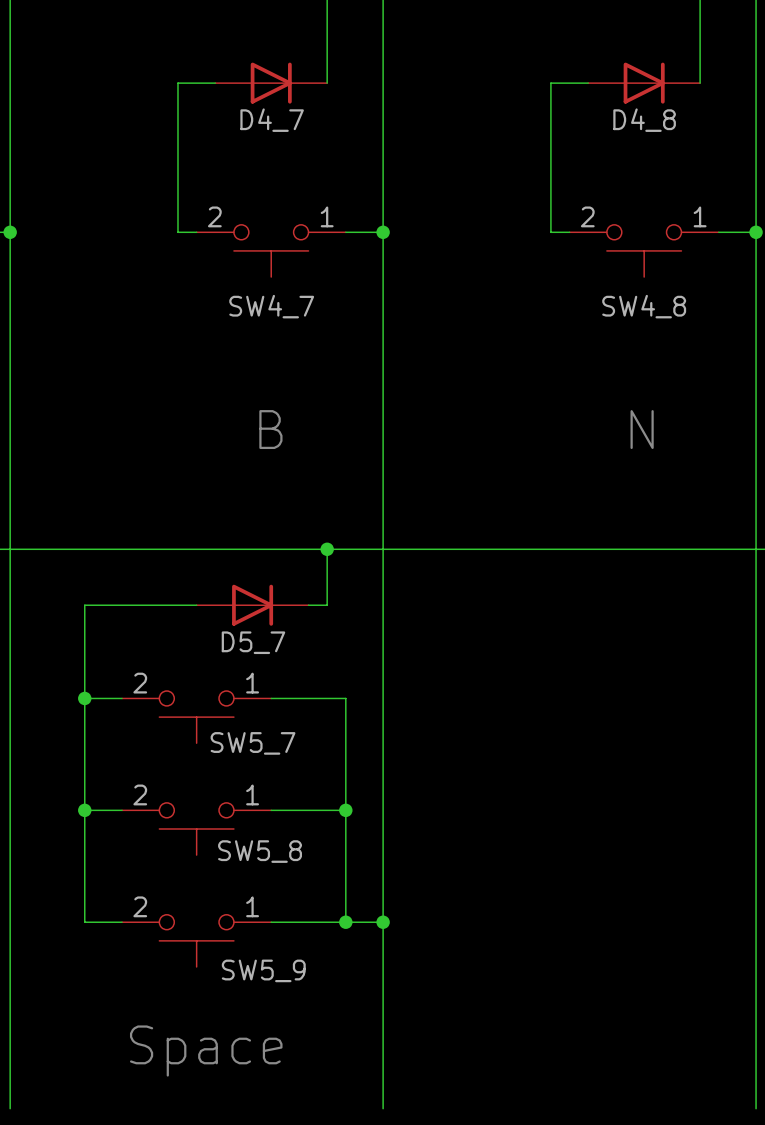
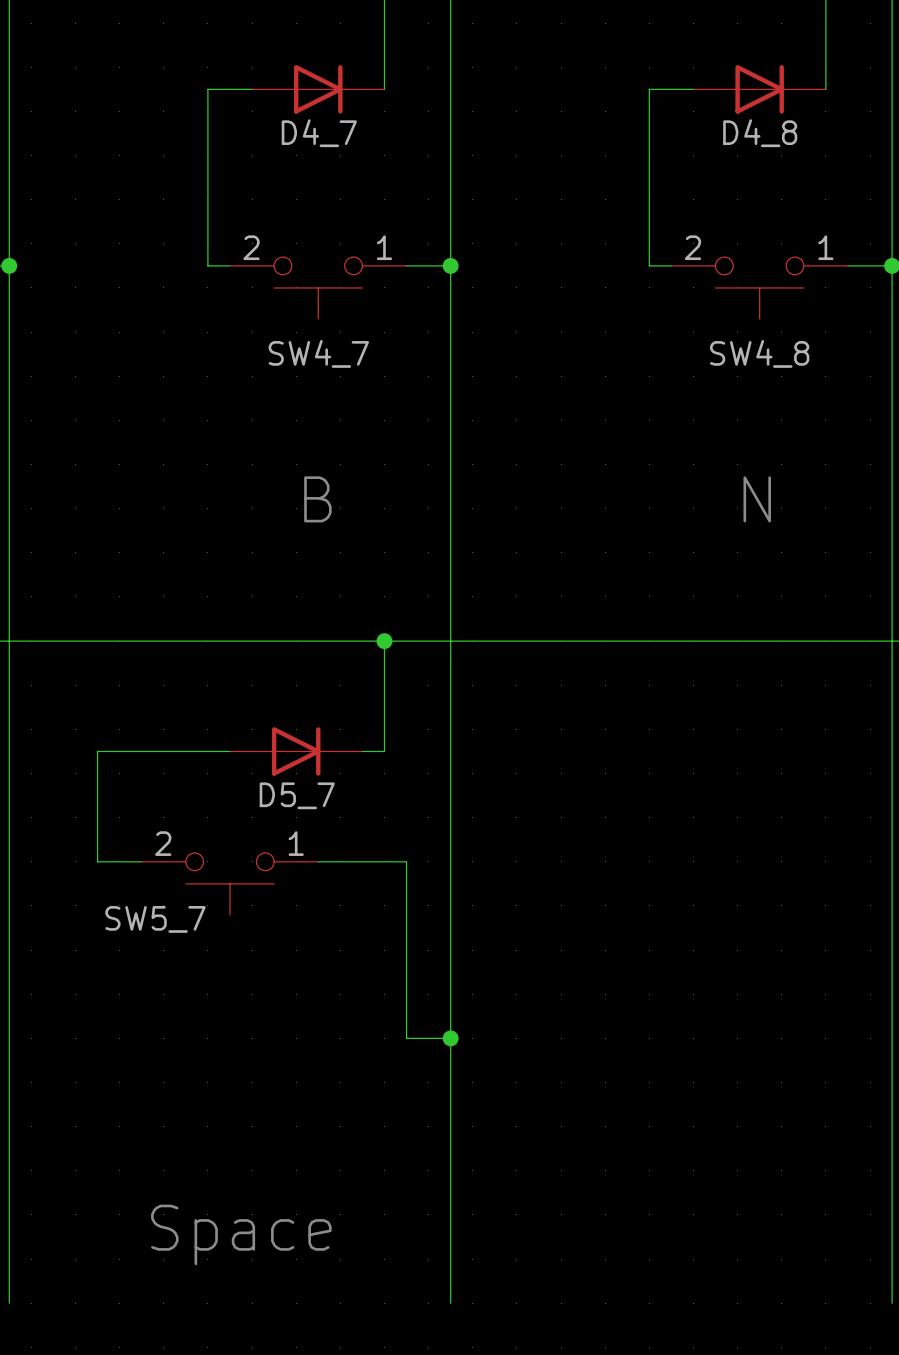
wire: (196, 605) (84, 605) (84, 642) -> (229, 751) (97, 751)
D5_7 position: (252, 605) -> (296, 751)
wire: (308, 605) (327, 605) -> (362, 751) (384, 751) (384, 707)
wire: (84, 698) (122, 698) -> none
junction: (84, 698) -> none
wire: (271, 698) (345, 698) (345, 735) -> (318, 861) (406, 861)
SW5_7 position: (196, 717) -> (229, 883)
wire: (84, 735) (84, 922) (122, 922) -> (97, 861) (141, 861)
SW5_7 name position: SW5_7 (253, 743) -> SW5_7 (155, 919)
wire: (84, 810) (122, 810) -> none
junction: (84, 810) -> none
wire: (271, 810) (345, 810) -> none
junction: (345, 810) -> none
SW5_8: (196, 828) -> none
wire: (345, 884) (345, 922) -> (406, 1038) (450, 1038)
junction: none -> (450, 1038)
wire: (271, 922) (383, 922) -> none
junction: (345, 922) -> none
junction: (383, 922) -> none
SW5_9: (196, 940) -> none

